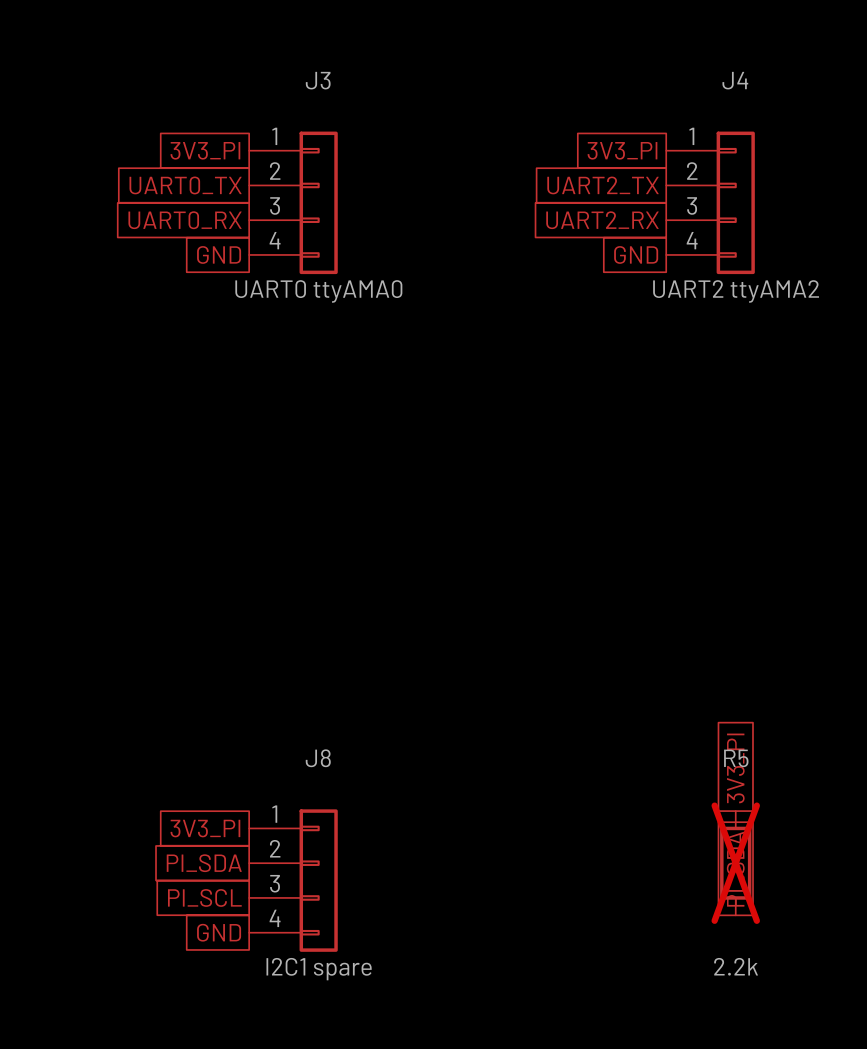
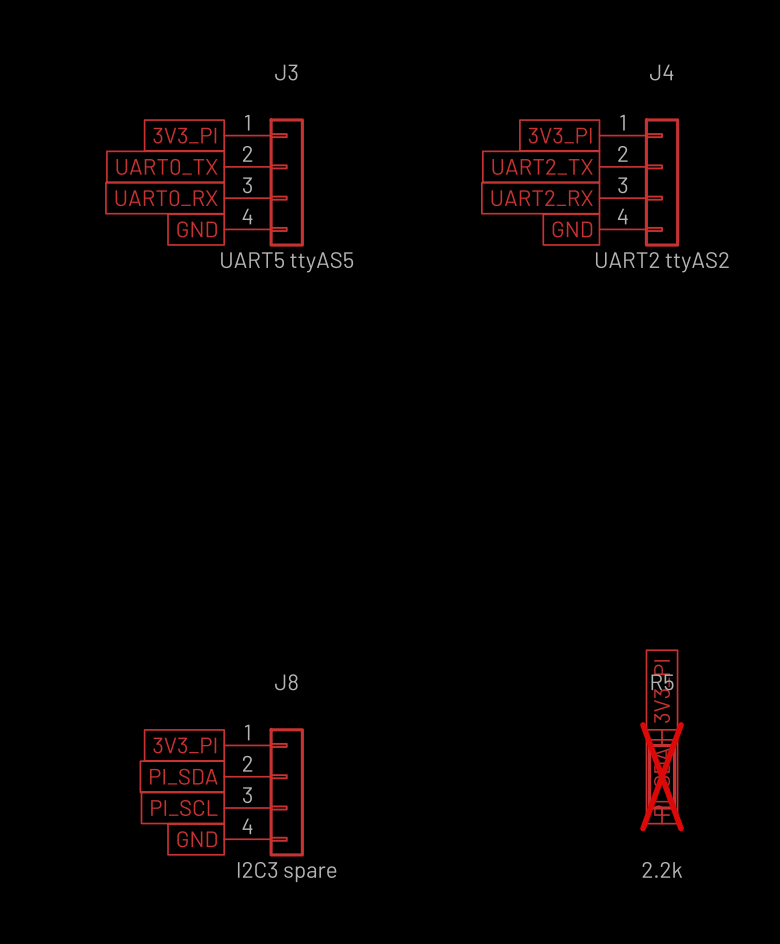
J3 value: UART0 ttyAMA0 (318, 291) -> UART5 ttyAS5 (287, 262)
J4 value: UART2 ttyAMA2 (736, 291) -> UART2 ttyAS2 (662, 262)
J8 value: I2C1 spare (319, 969) -> I2C3 spare (287, 872)

